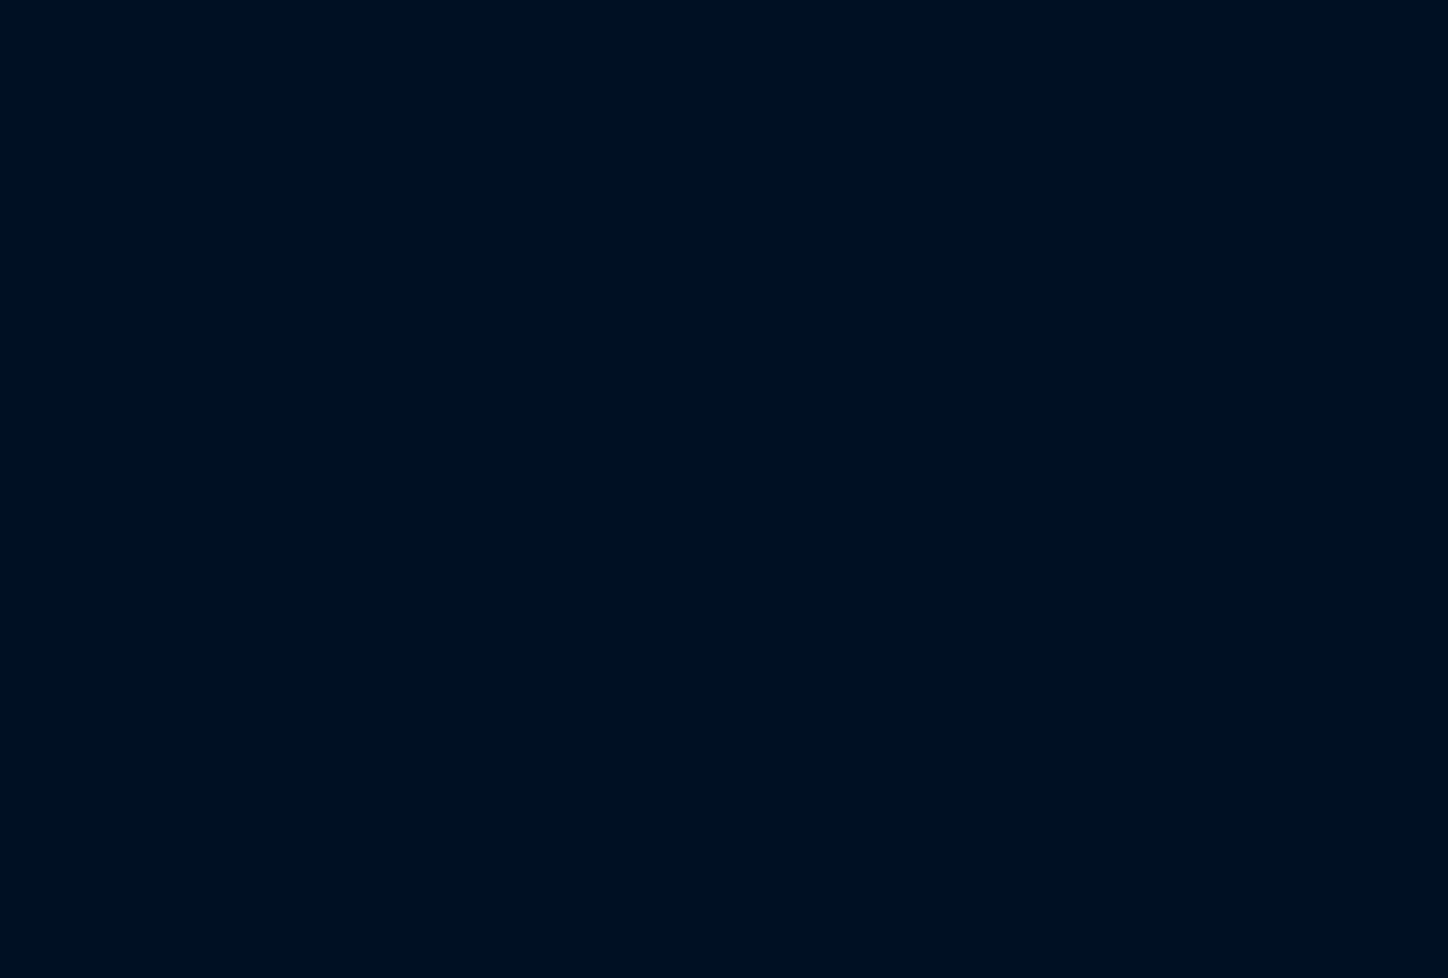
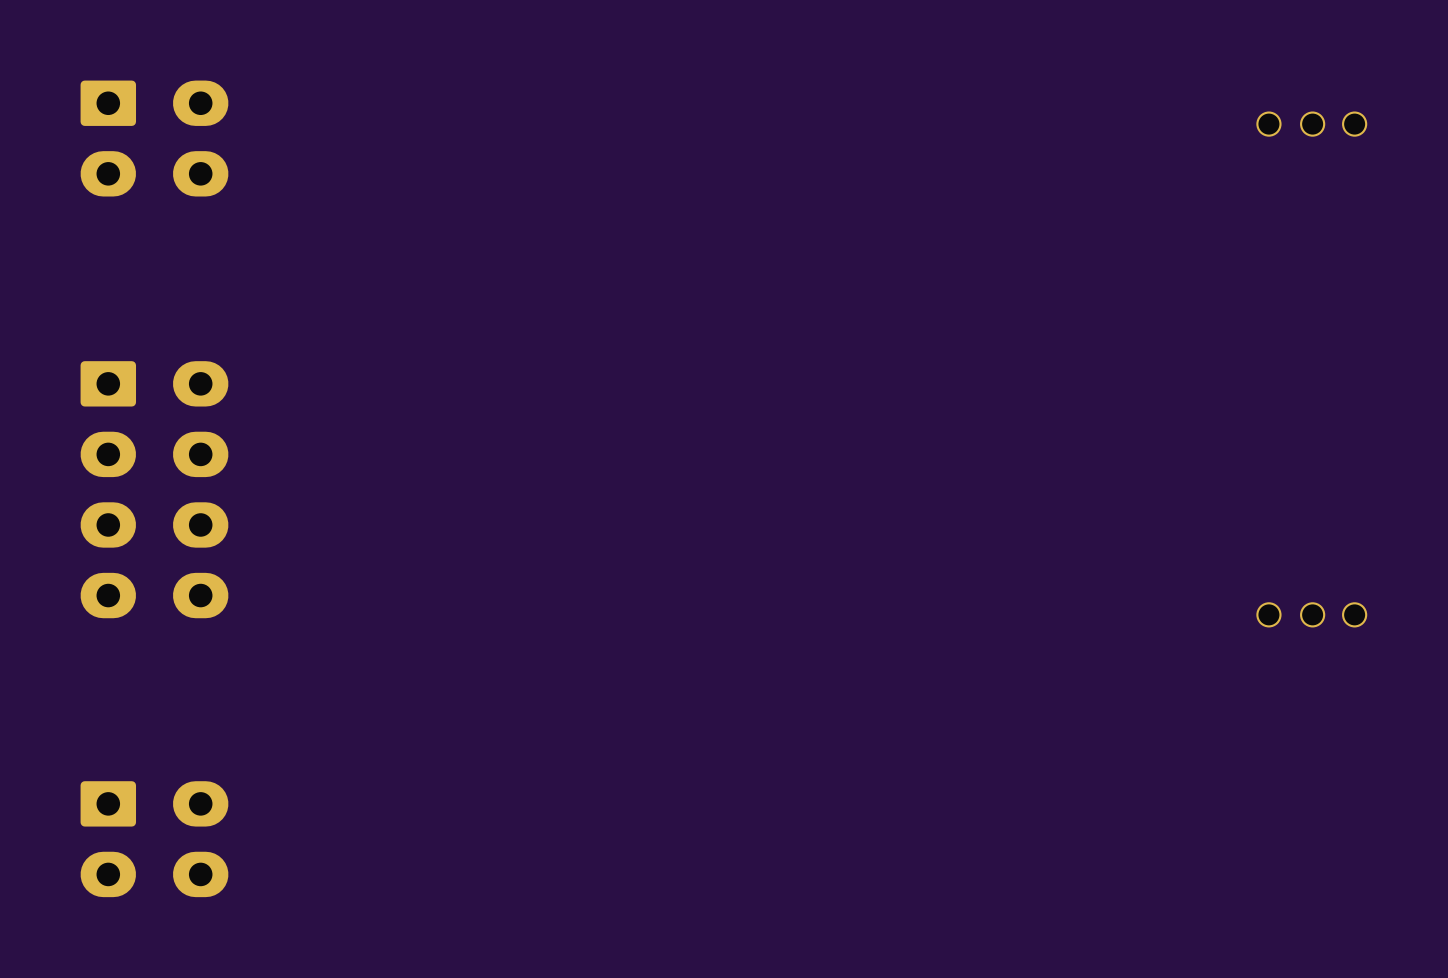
part: none -> (1311, 124)
part: none -> (154, 138)
part: none -> (154, 489)
part: none -> (1311, 614)
part: none -> (154, 839)

